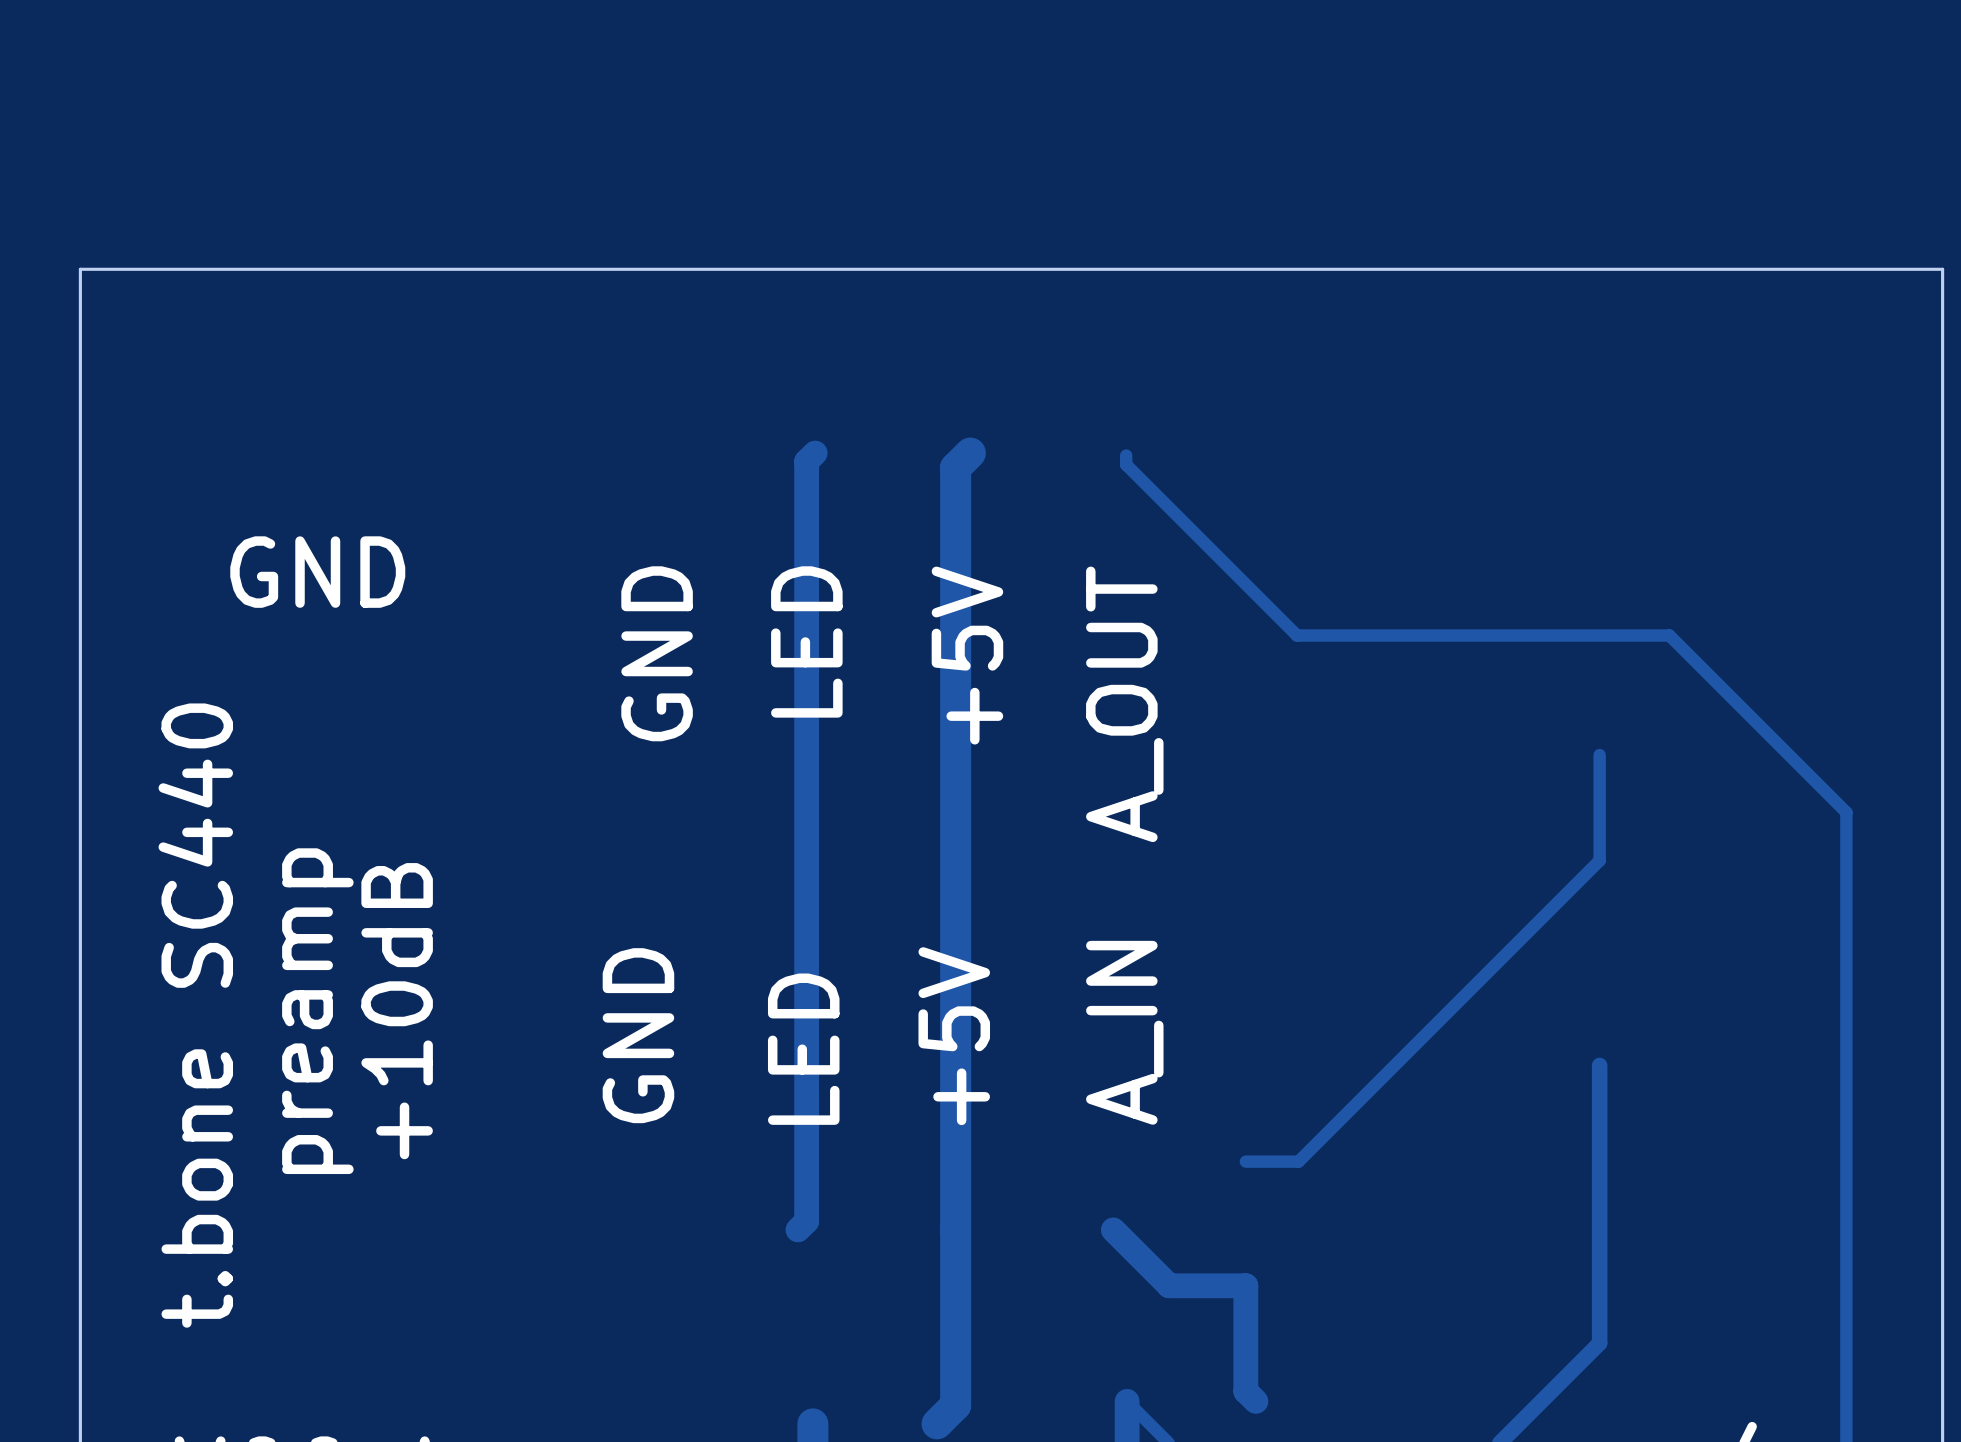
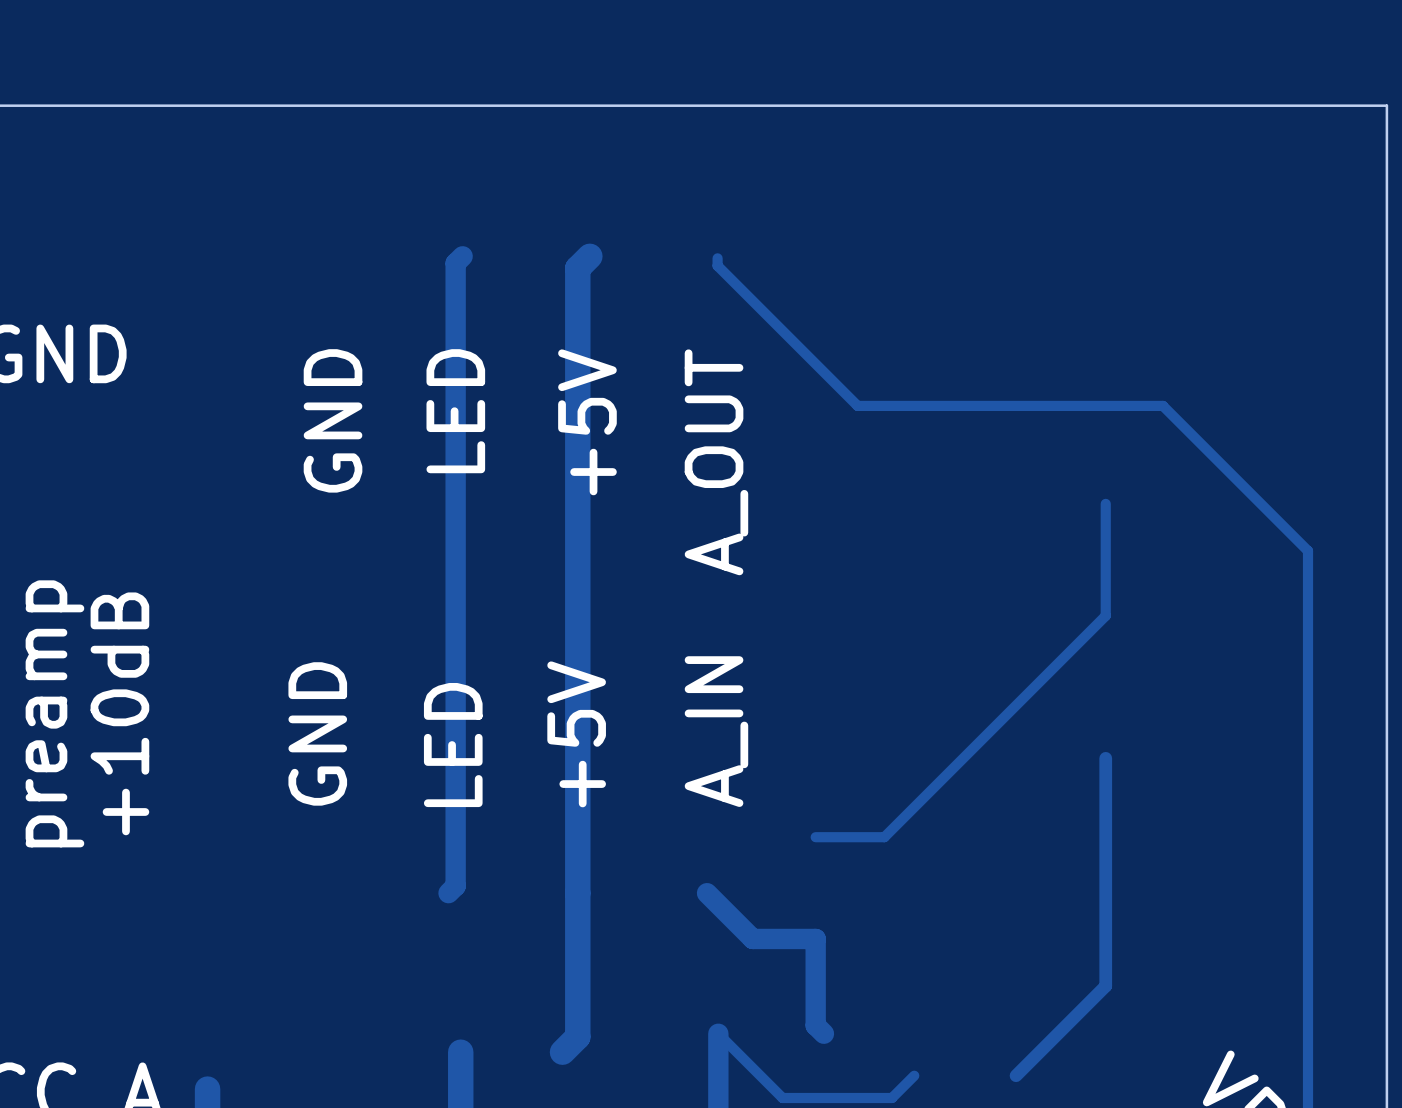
track: (1599, 860) (1298, 1161) -> (1105, 590) (1105, 615) (884, 837) (858, 837)

